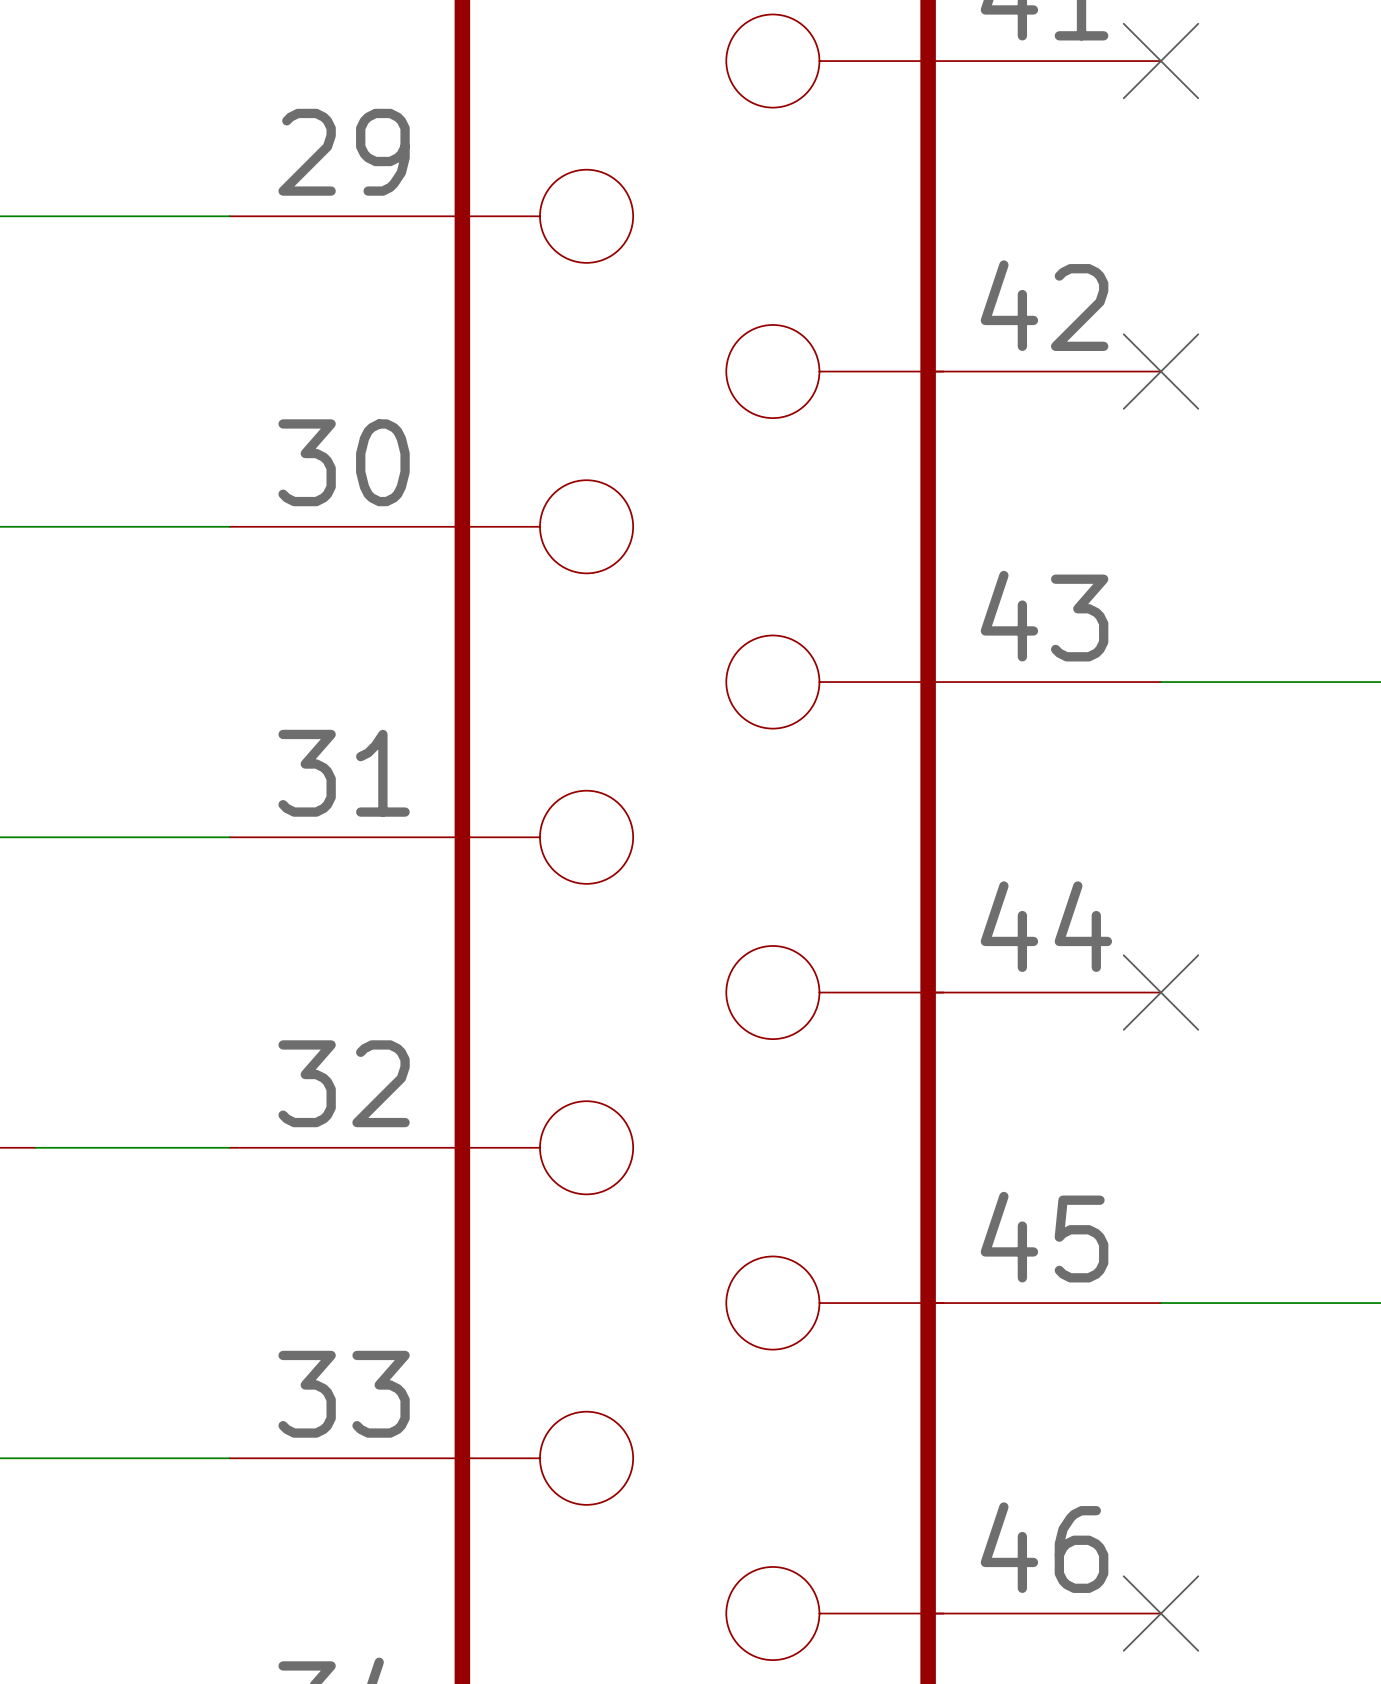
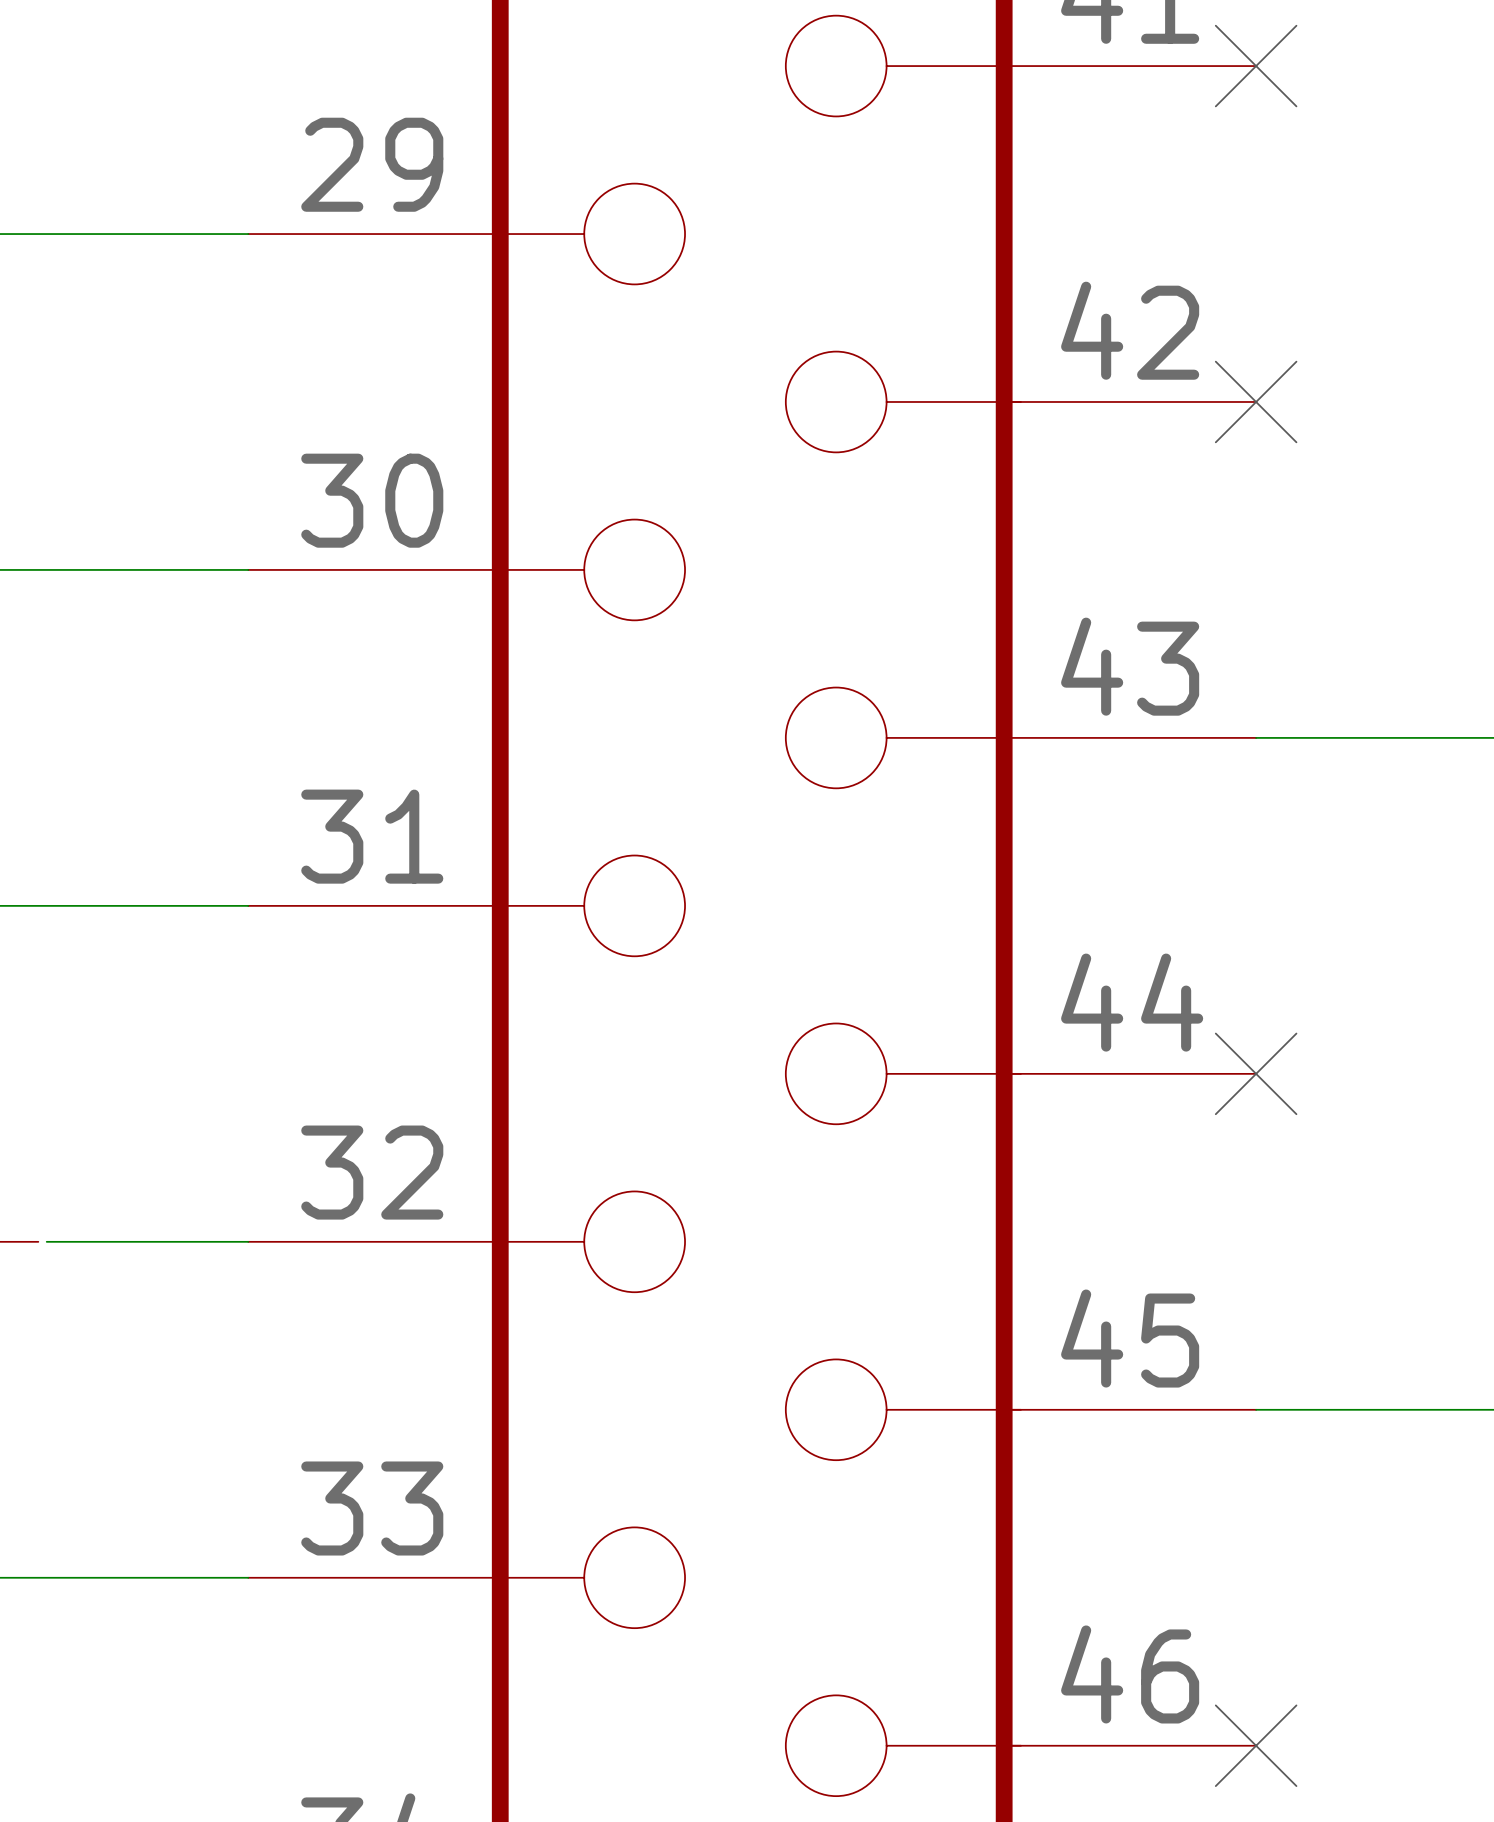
wire: (35, 1147) (43, 1147) -> none

